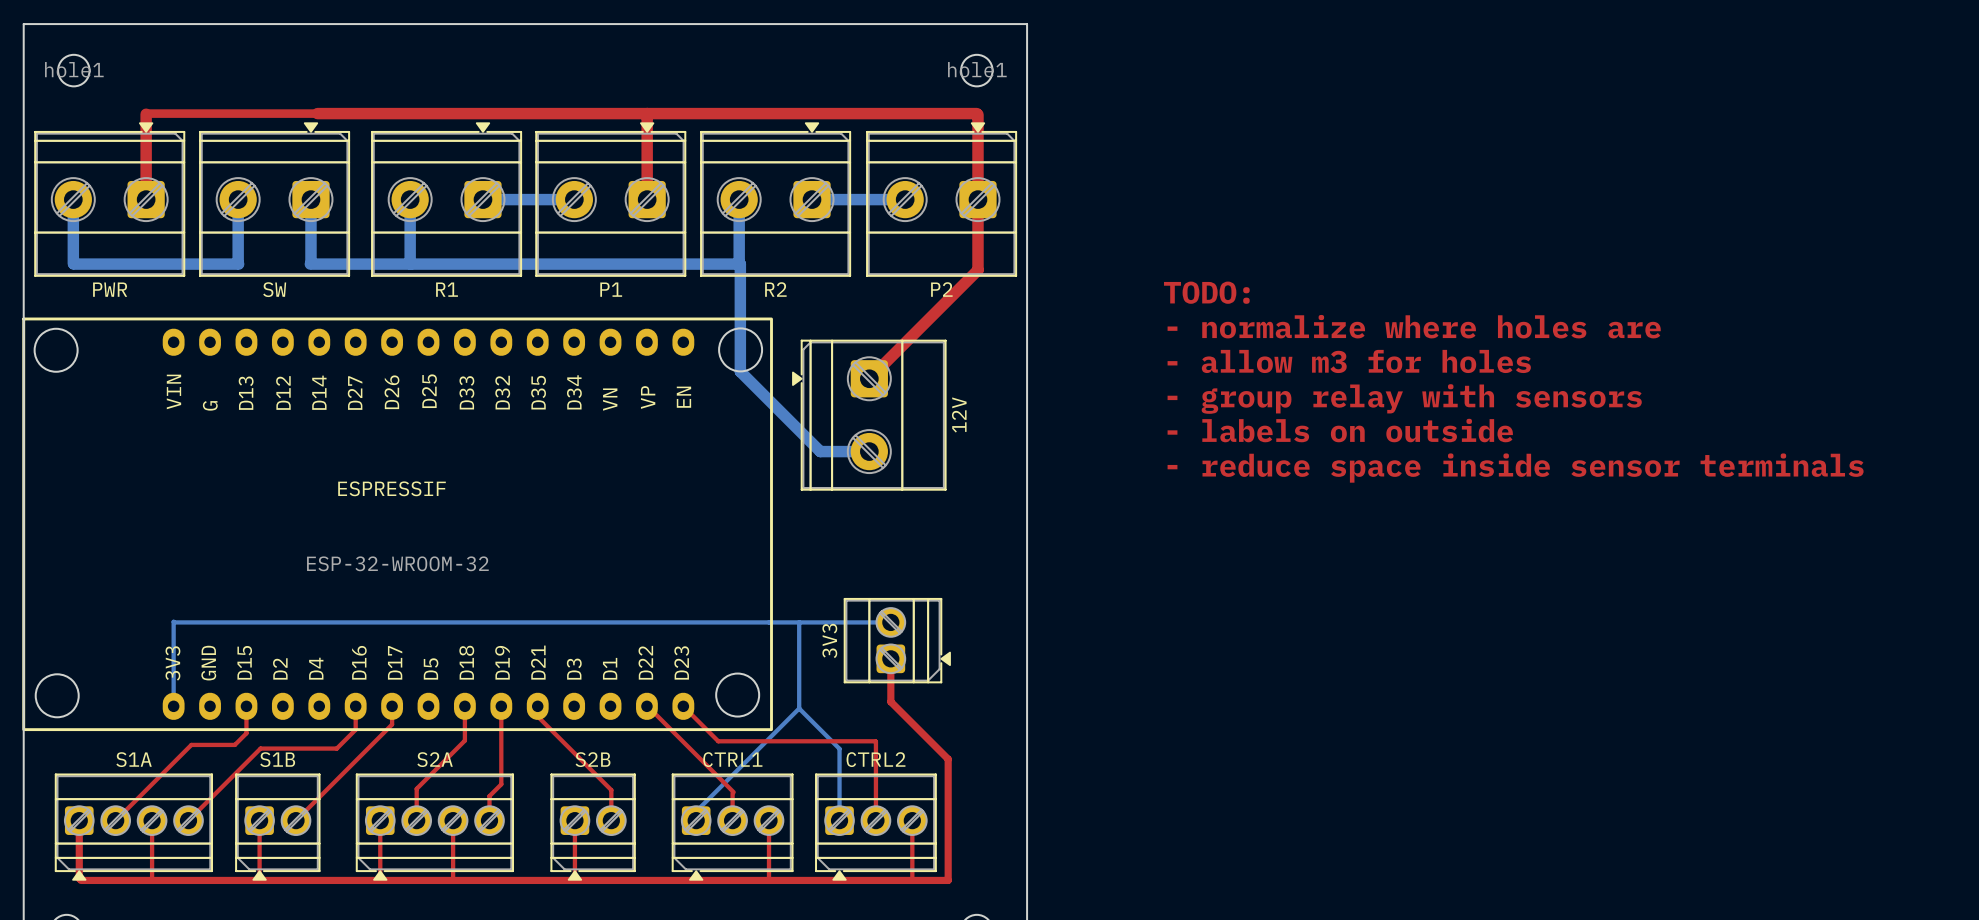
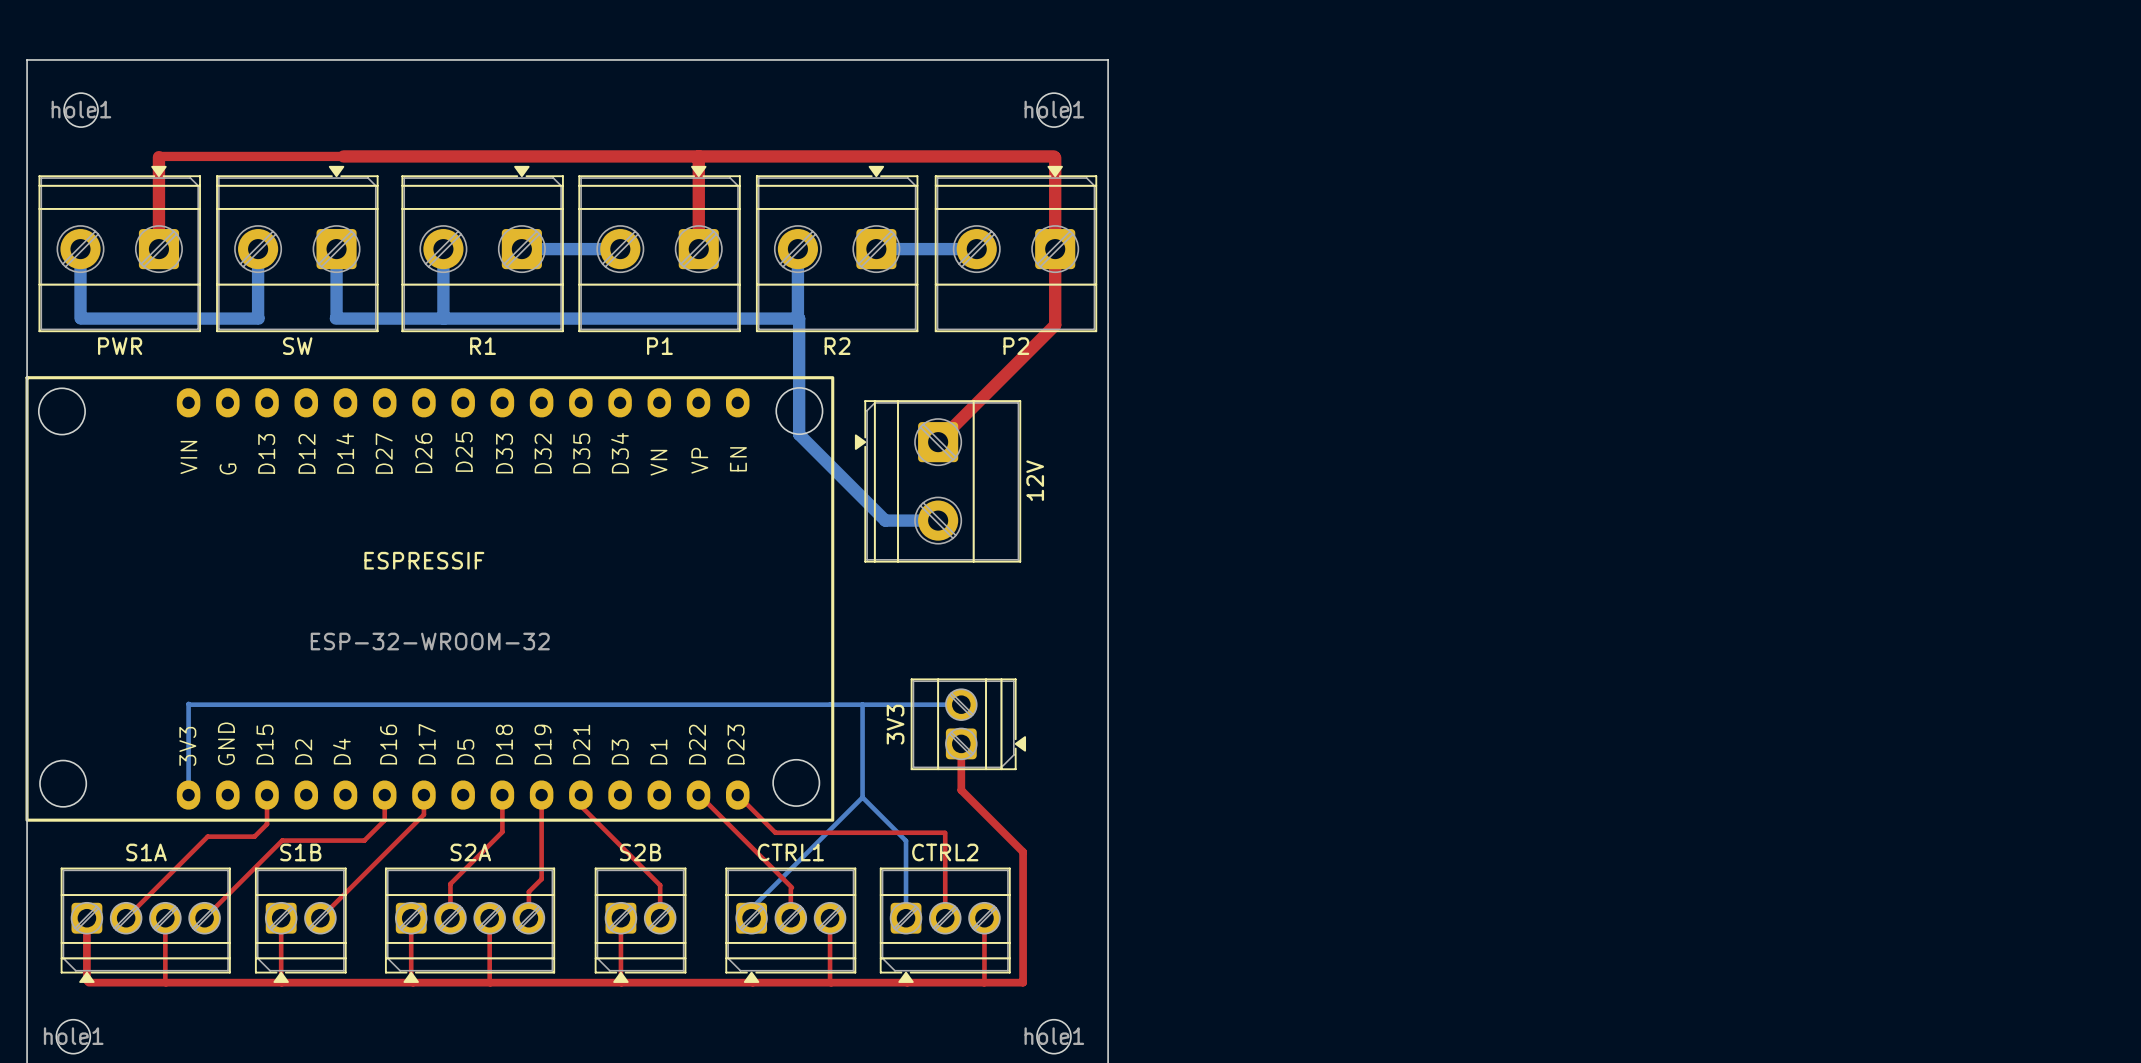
text: TODO: (1206, 292) -> none
text: - normalize where holes are (1414, 326) -> none
text: - allow m3 for holes (1349, 361) -> none
text: - group relay with sensors (1404, 398) -> none
text: - labels on outside (1340, 430) -> none
text: - reduce space inside sensor terminals (1515, 468) -> none

